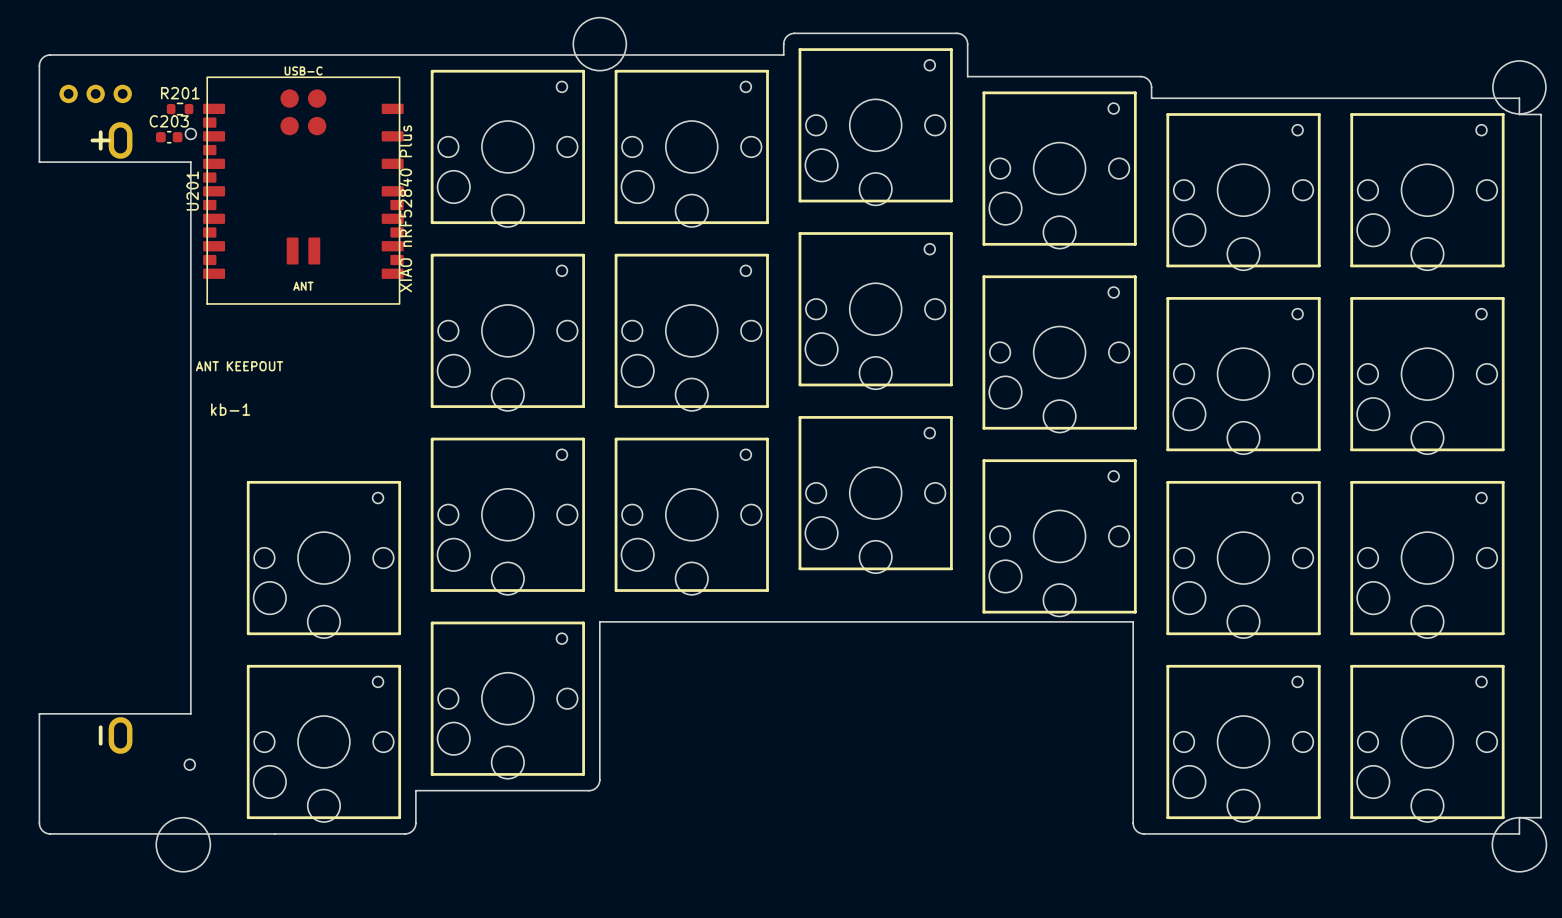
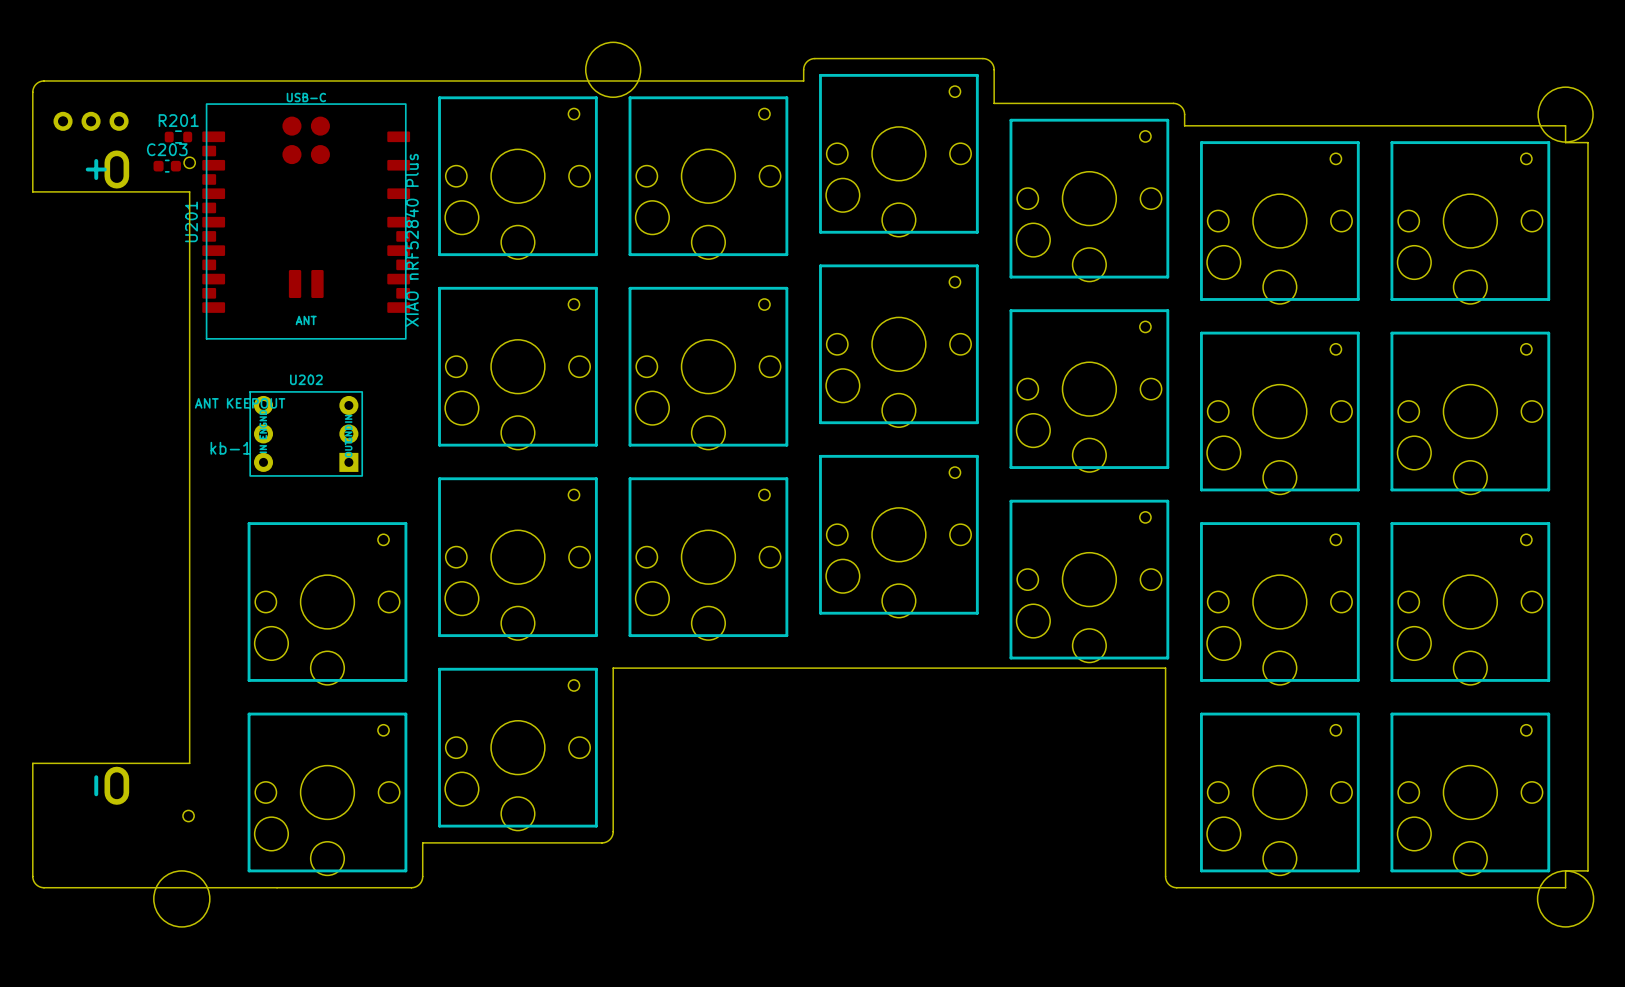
U202: none -> (306, 433)

